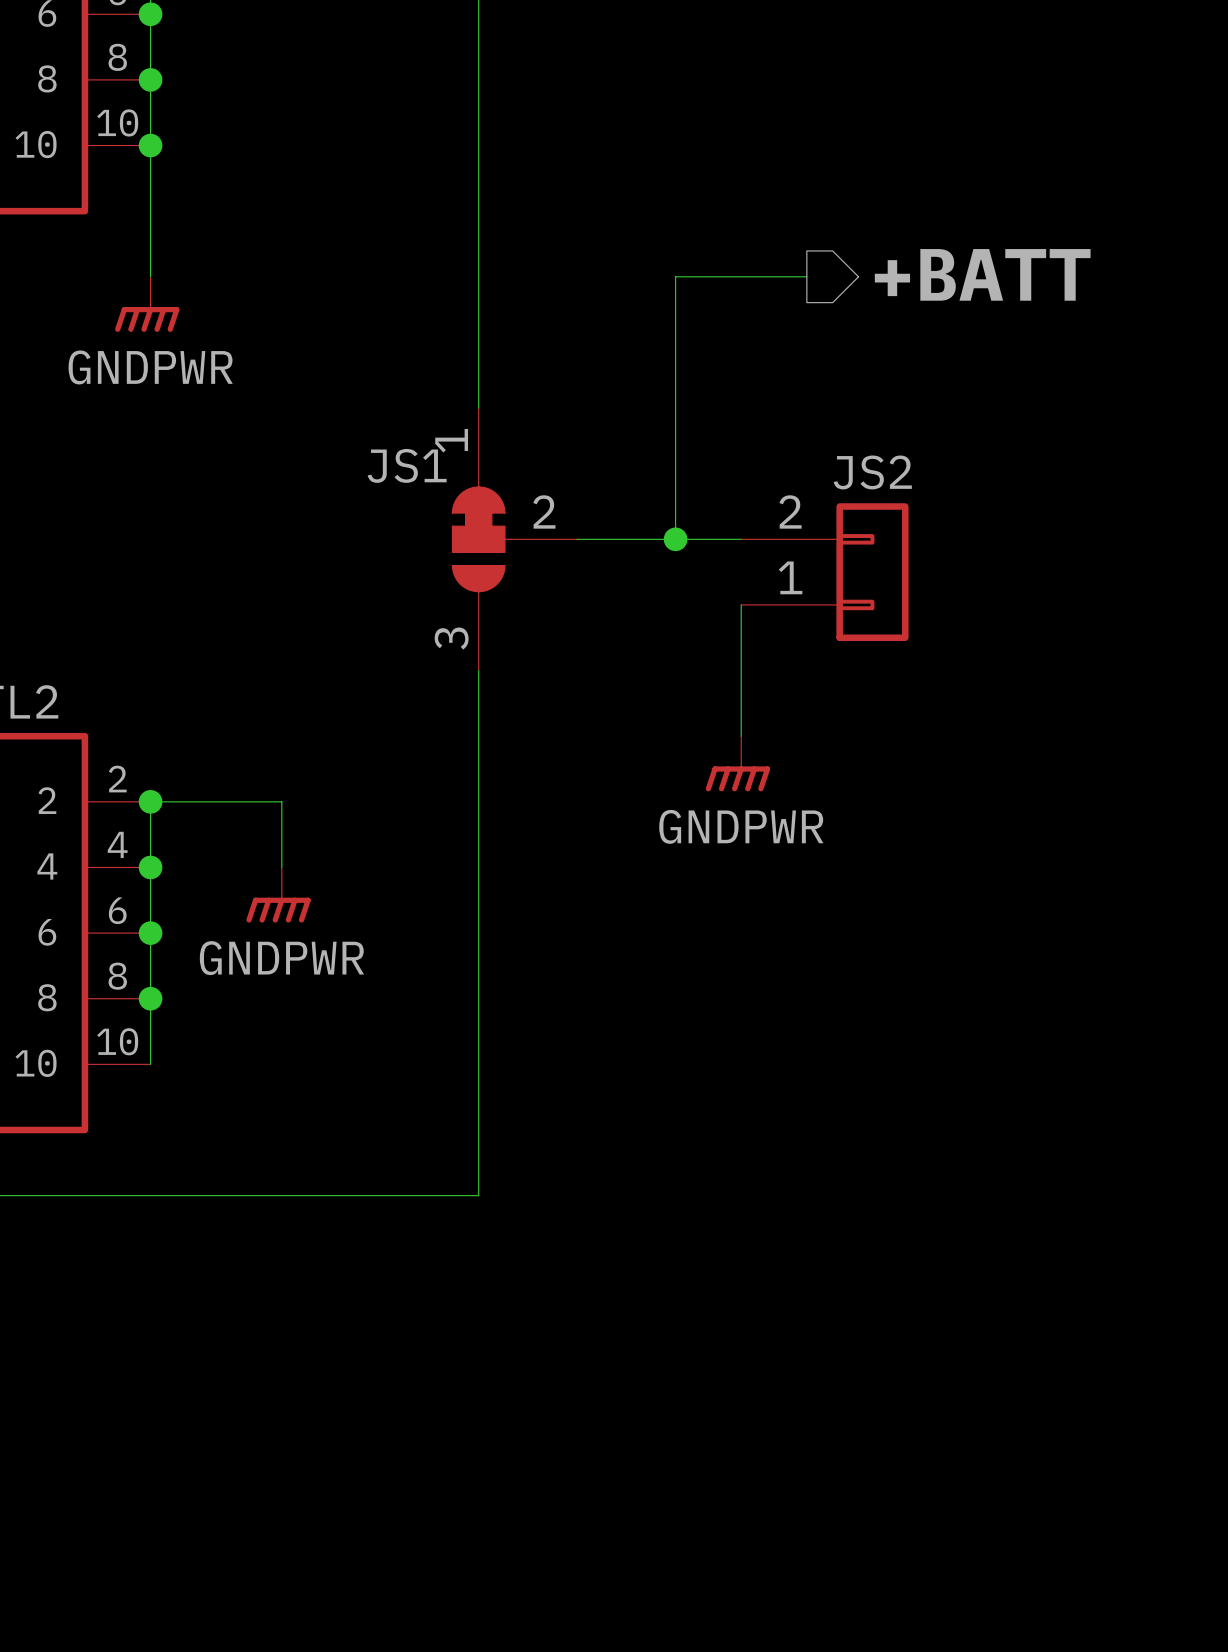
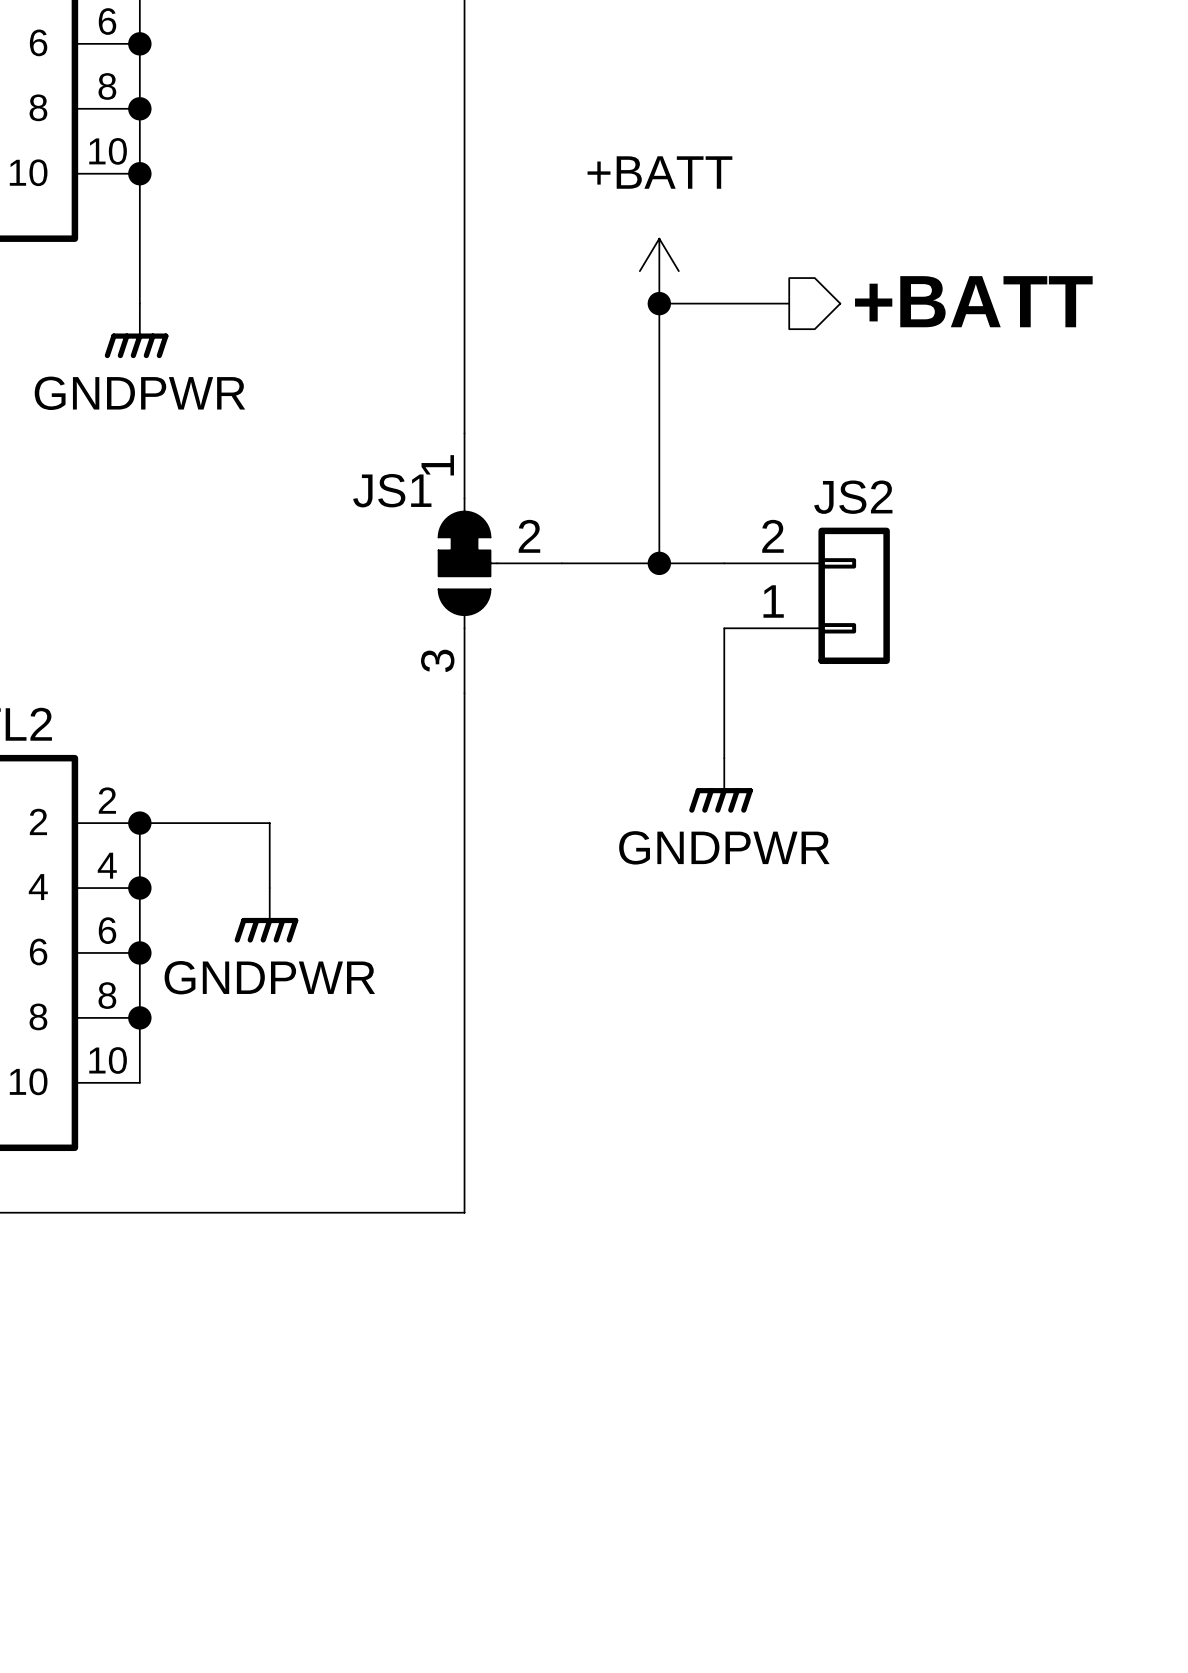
power symbol: none -> +BATT (659, 271)
junction: none -> (659, 303)

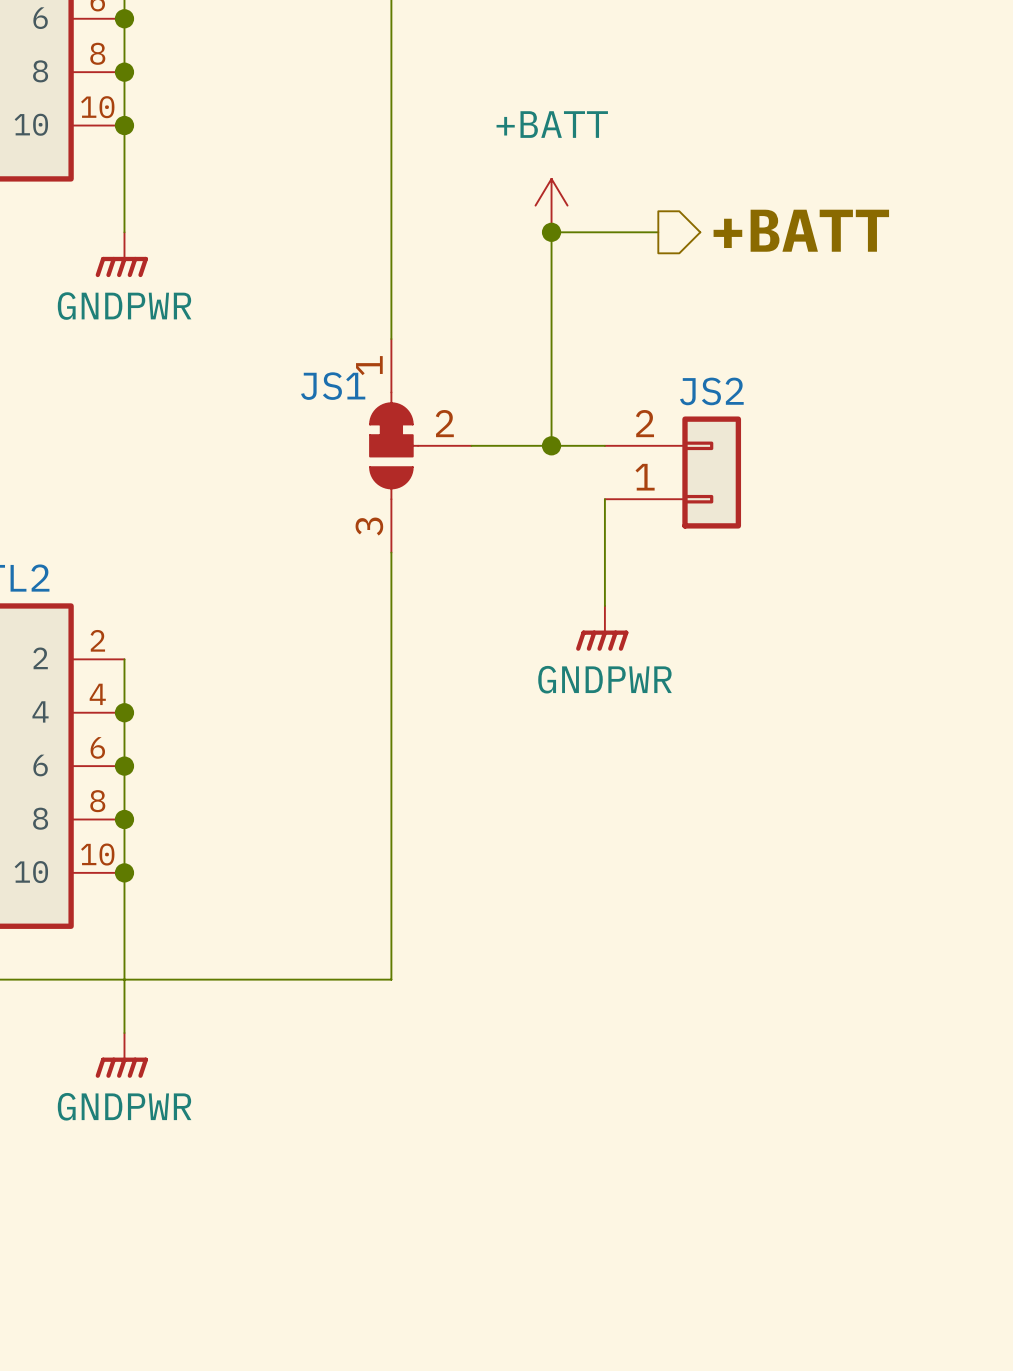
wire: (139, 823) (269, 823) (269, 888) -> none
junction: (139, 823) -> none
power symbol position: GNDPWR (266, 915) -> GNDPWR (121, 1055)
wire: none -> (124, 872) (124, 1033)
junction: none -> (124, 872)

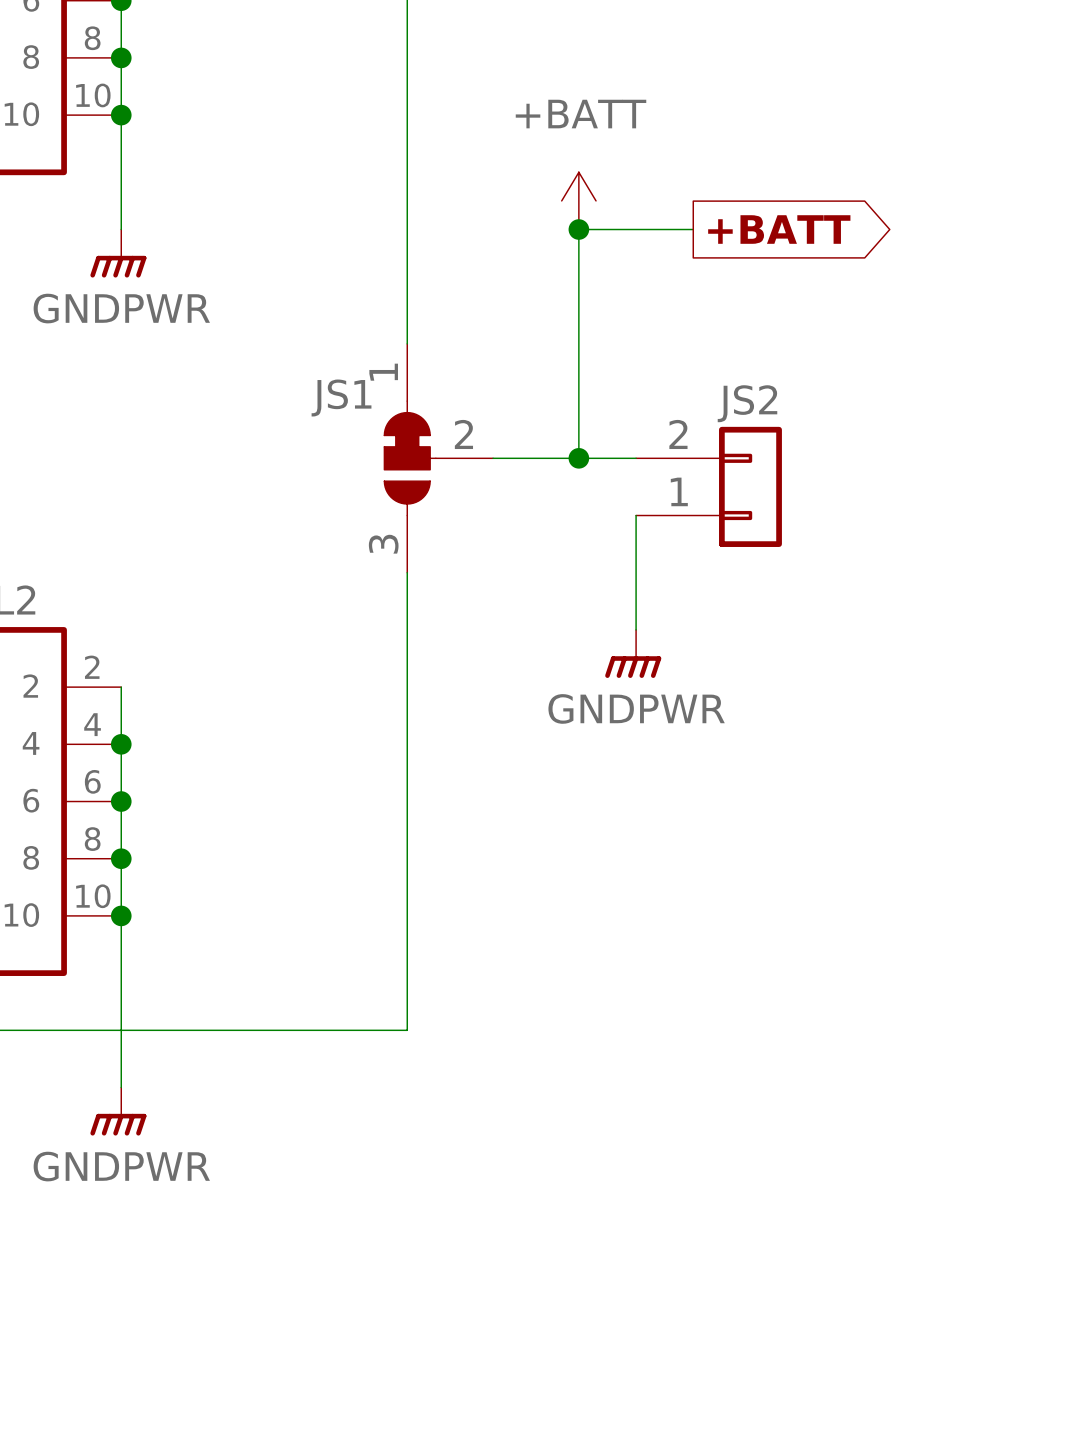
hierarchical label: +BATT (801, 230) -> none
global label: none -> +BATT (779, 229)

